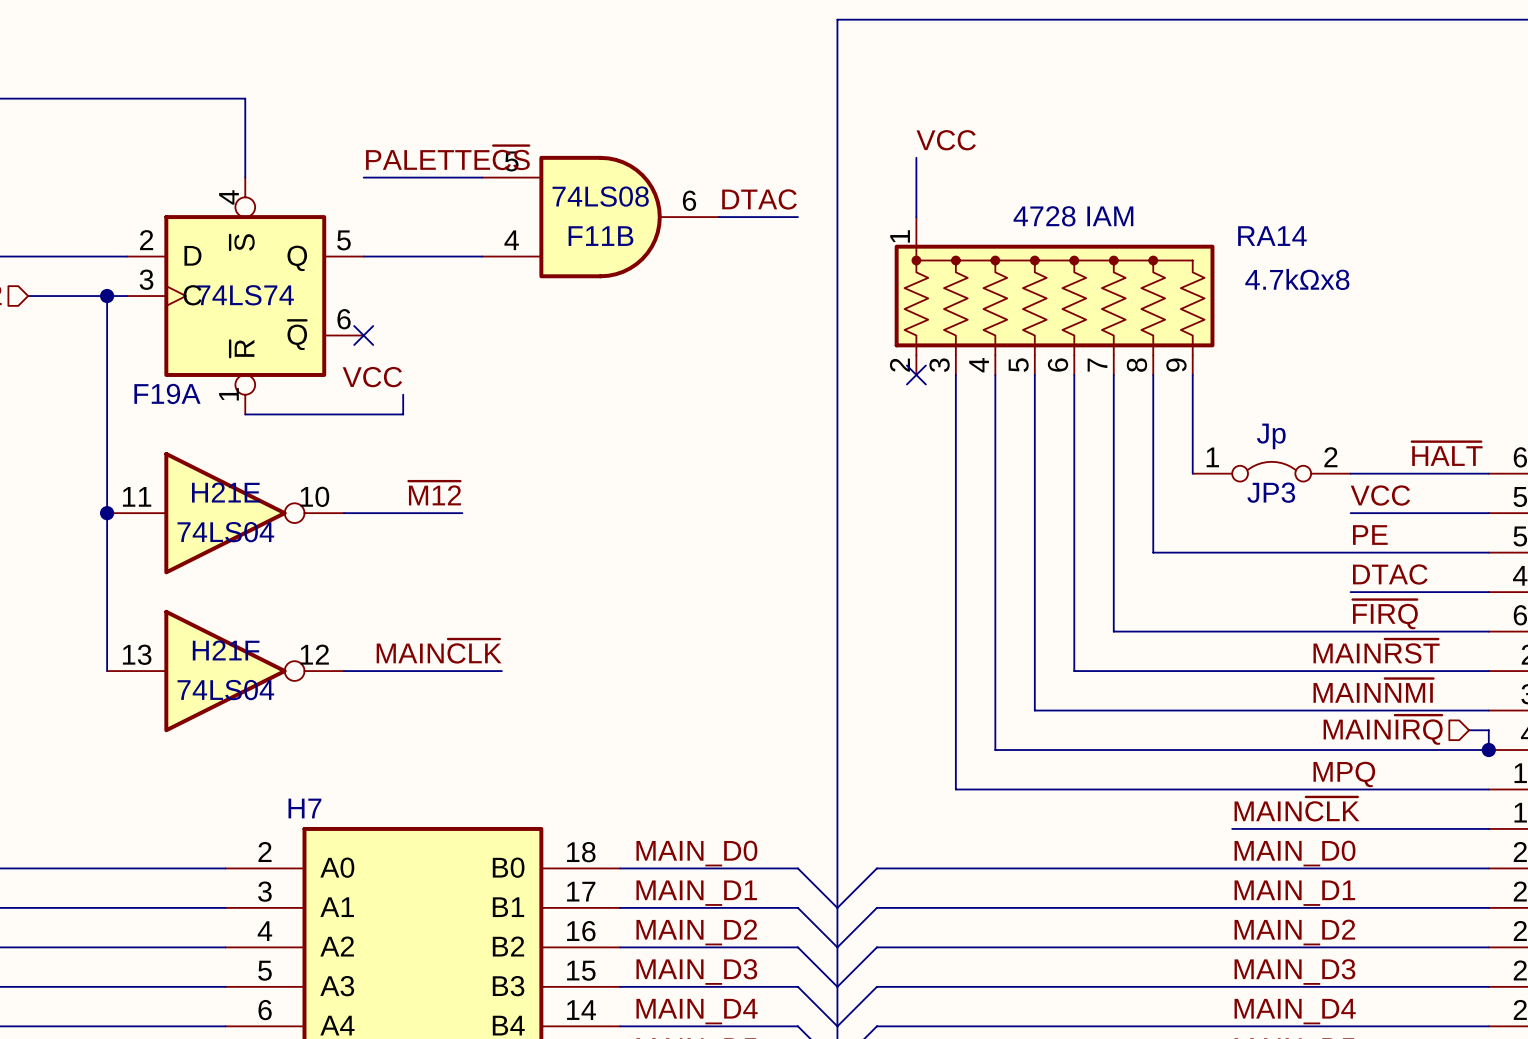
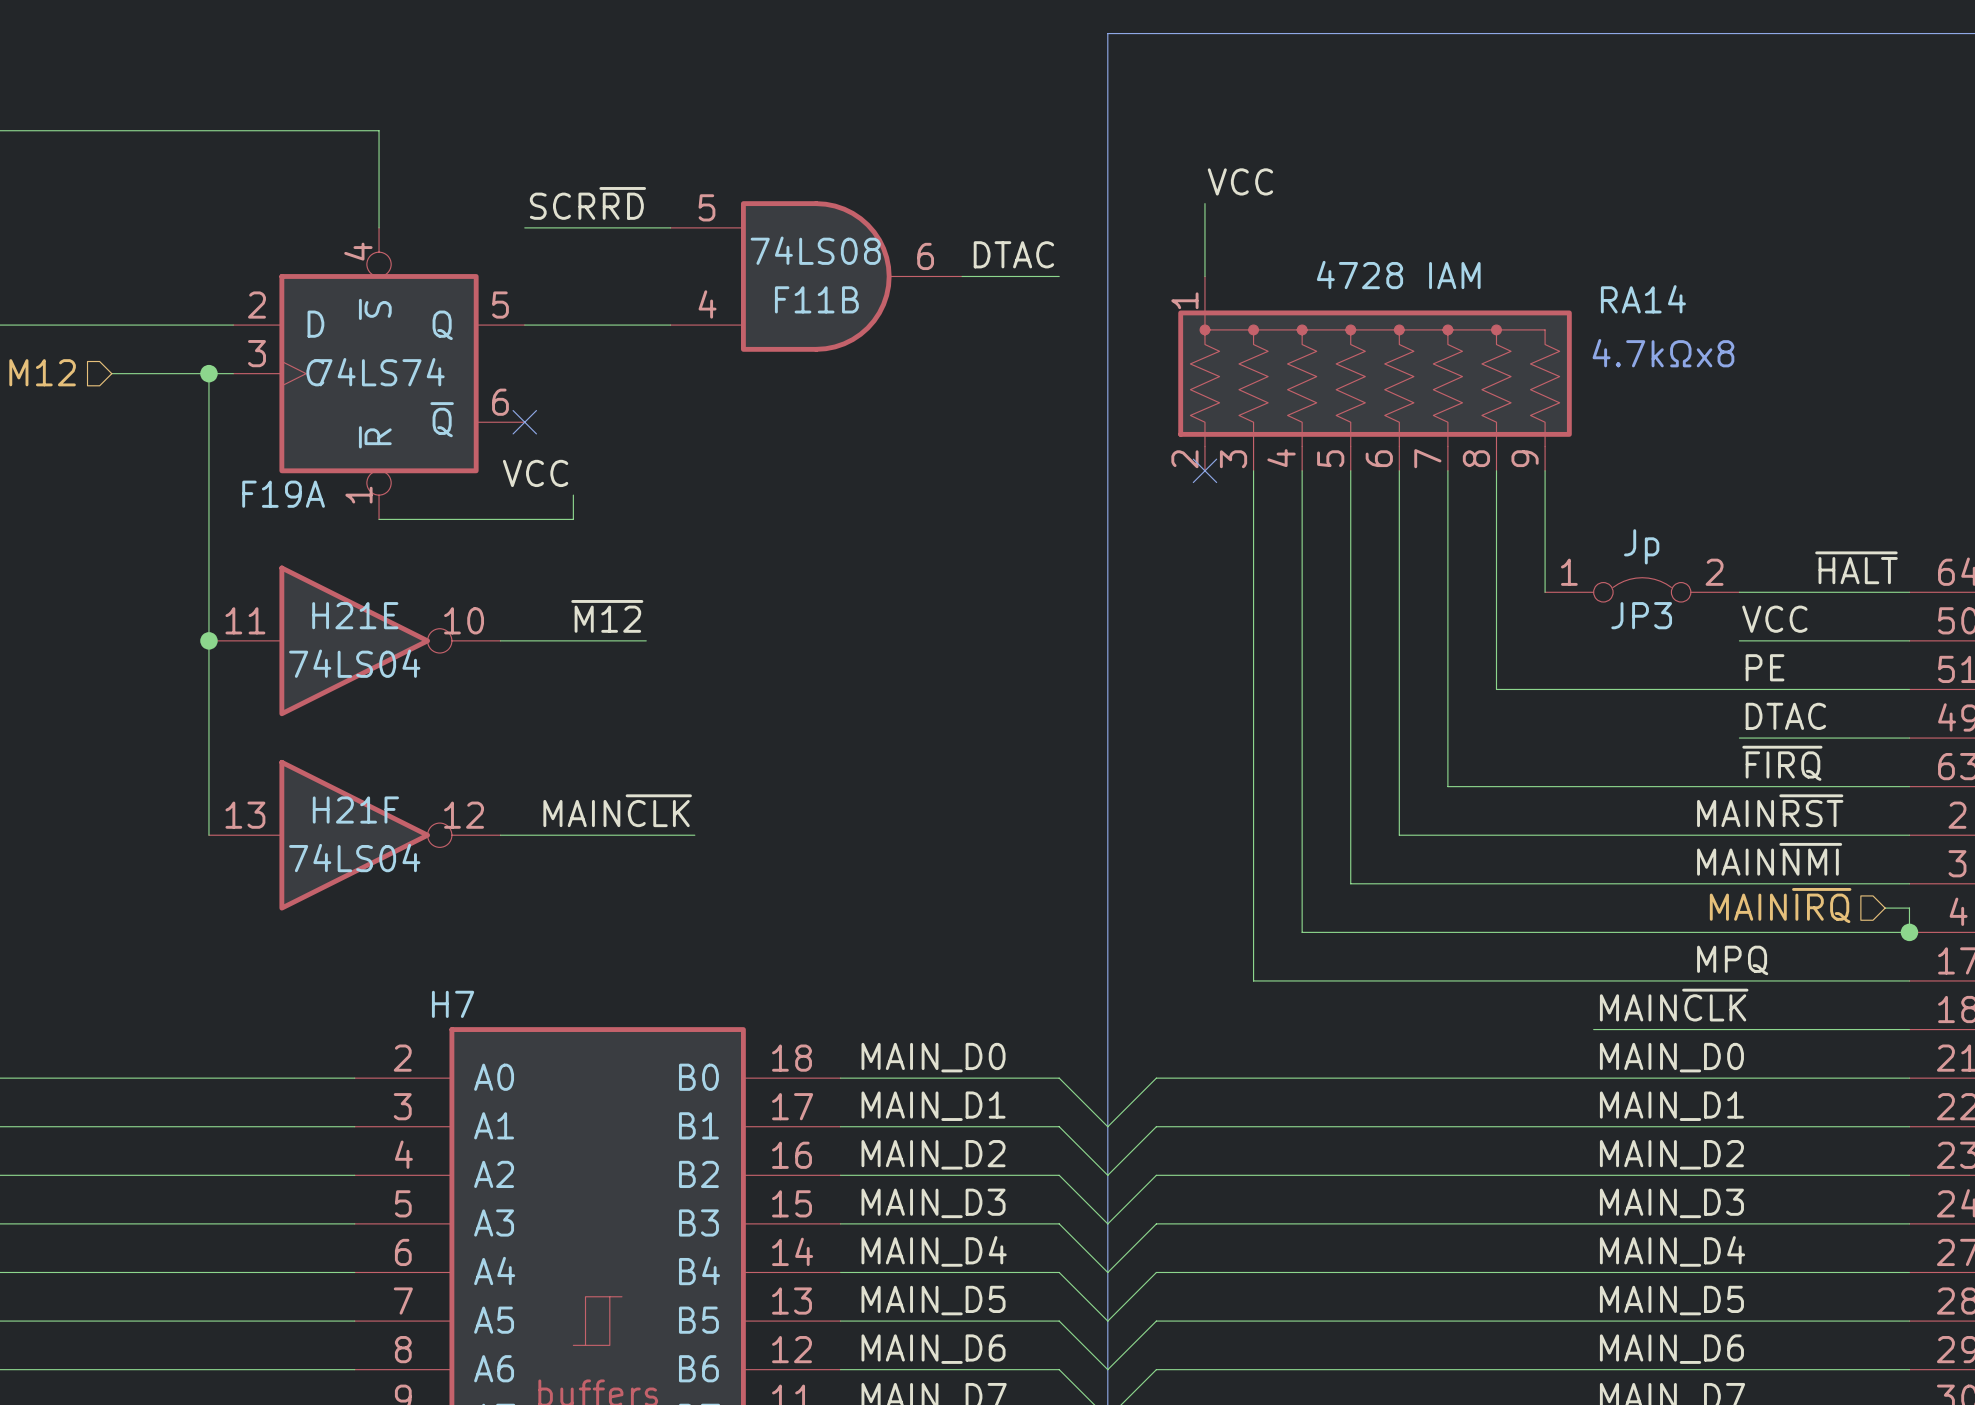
label: PALETTE~{CS} (447, 157) -> SCR~{RD} (587, 203)

